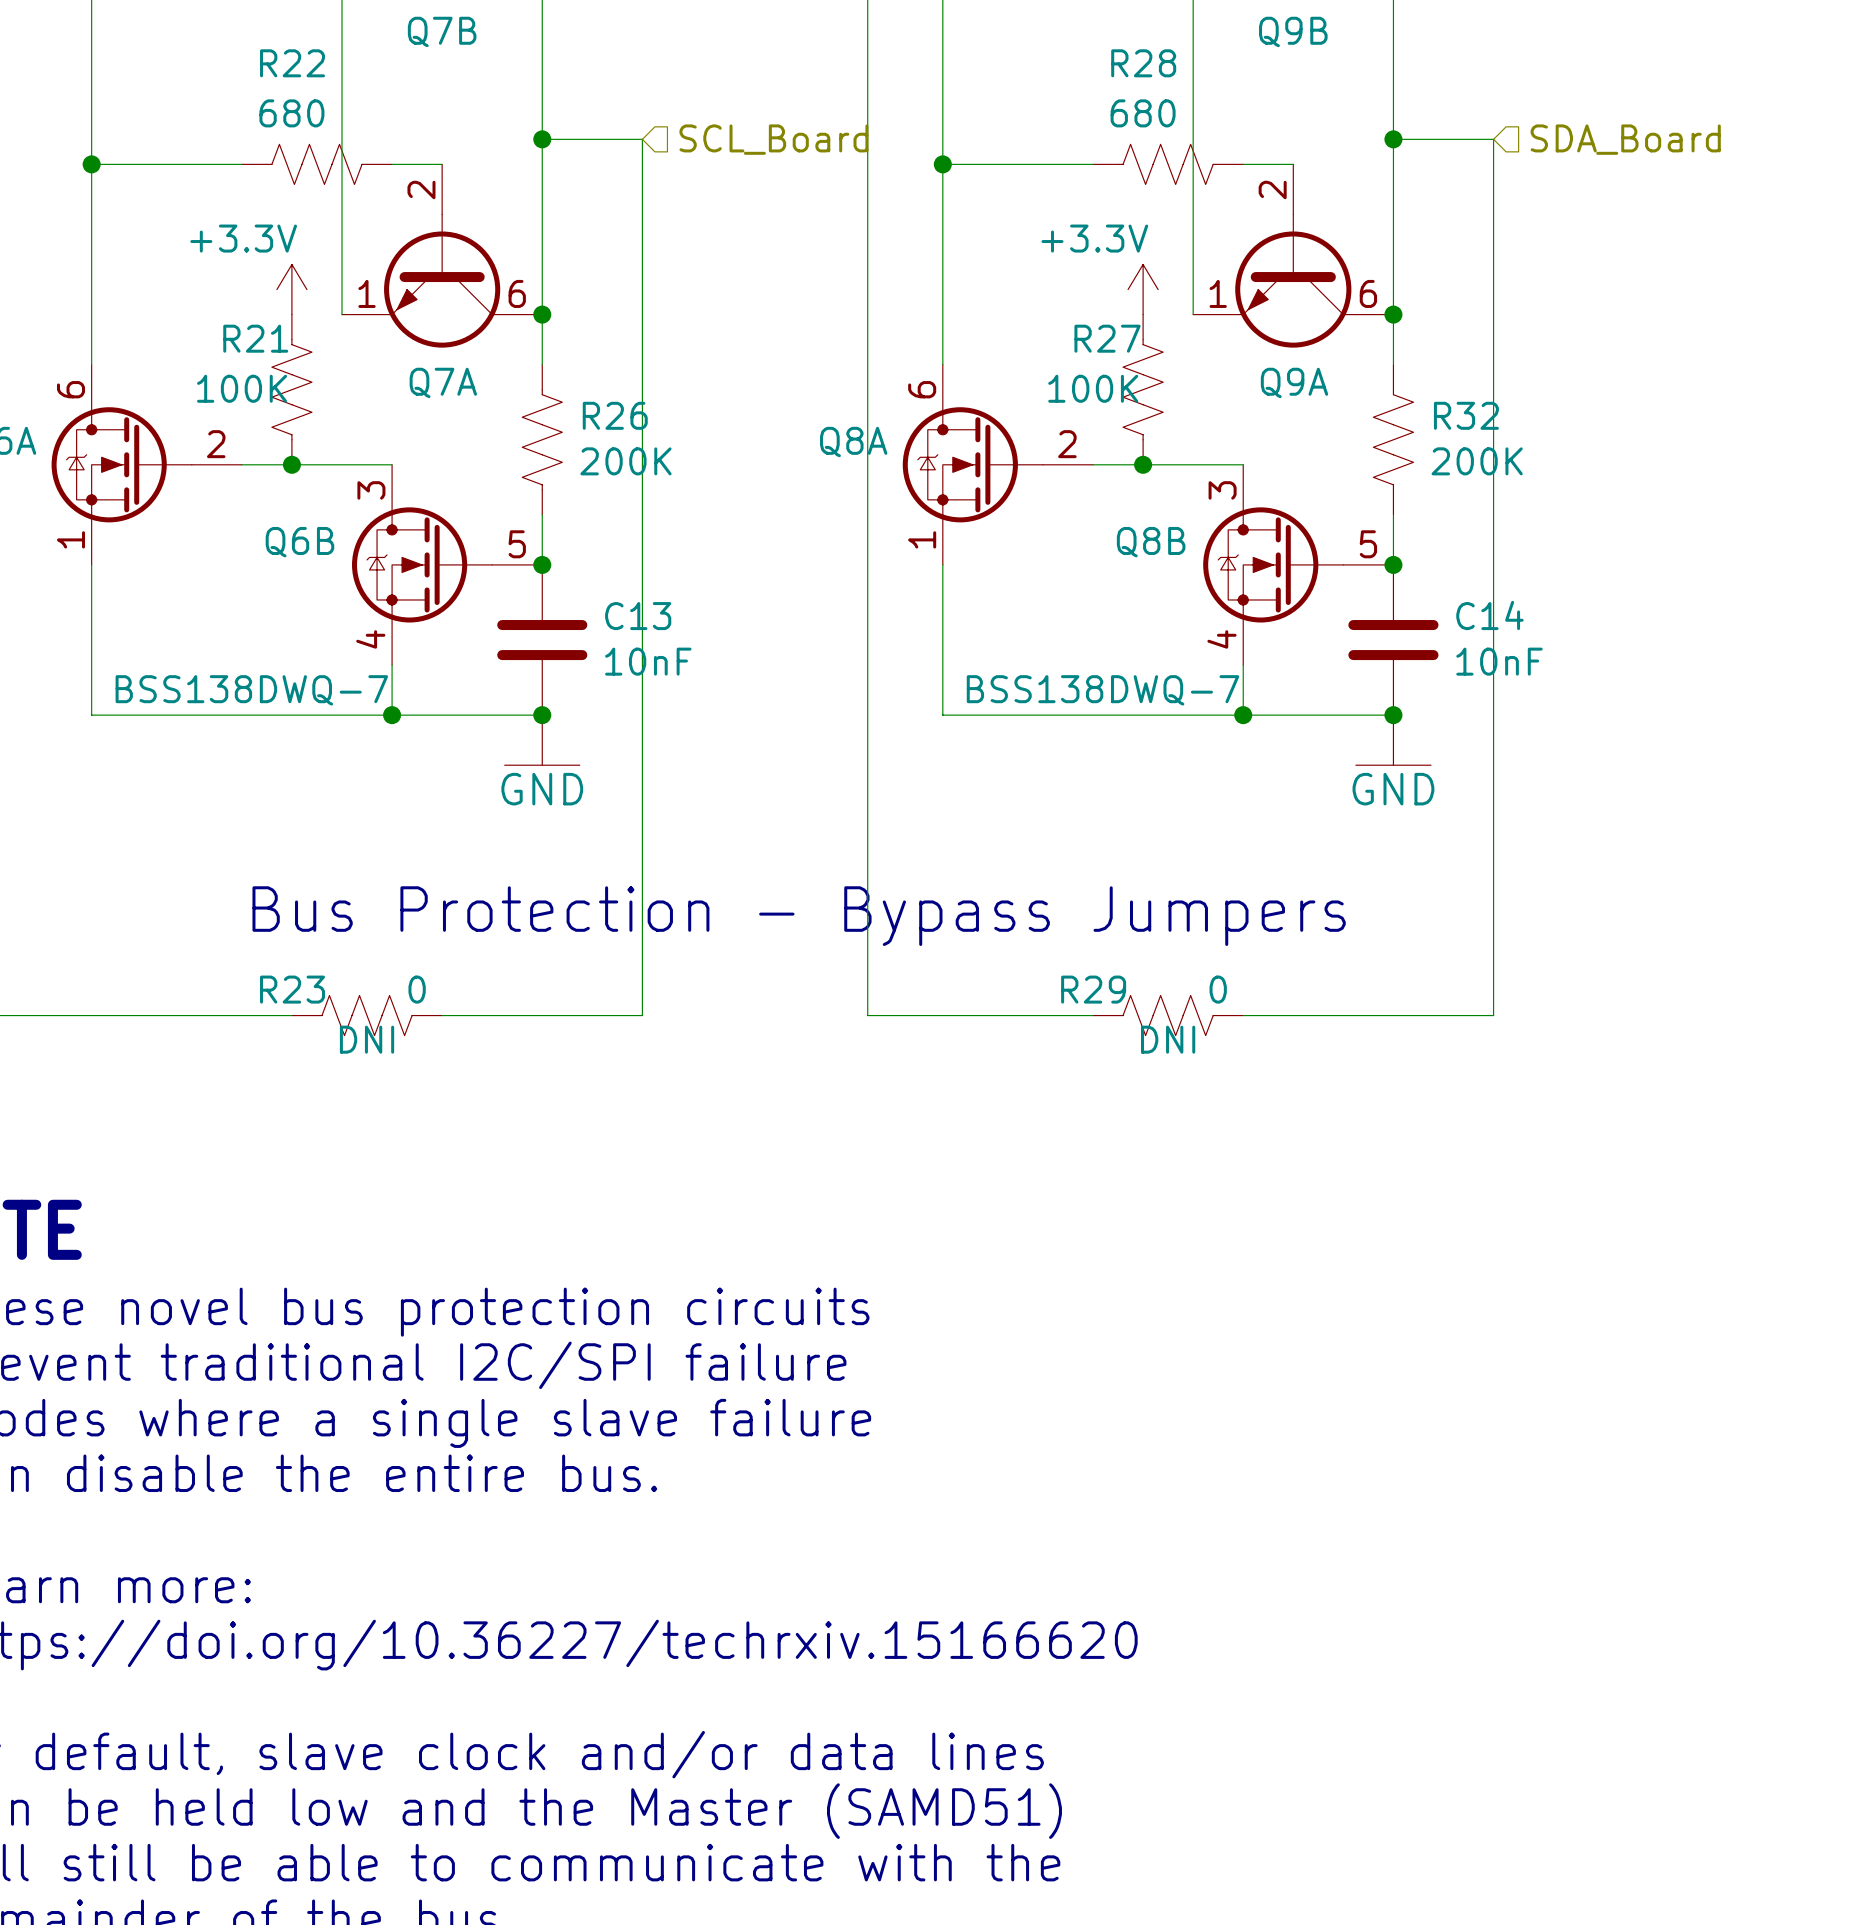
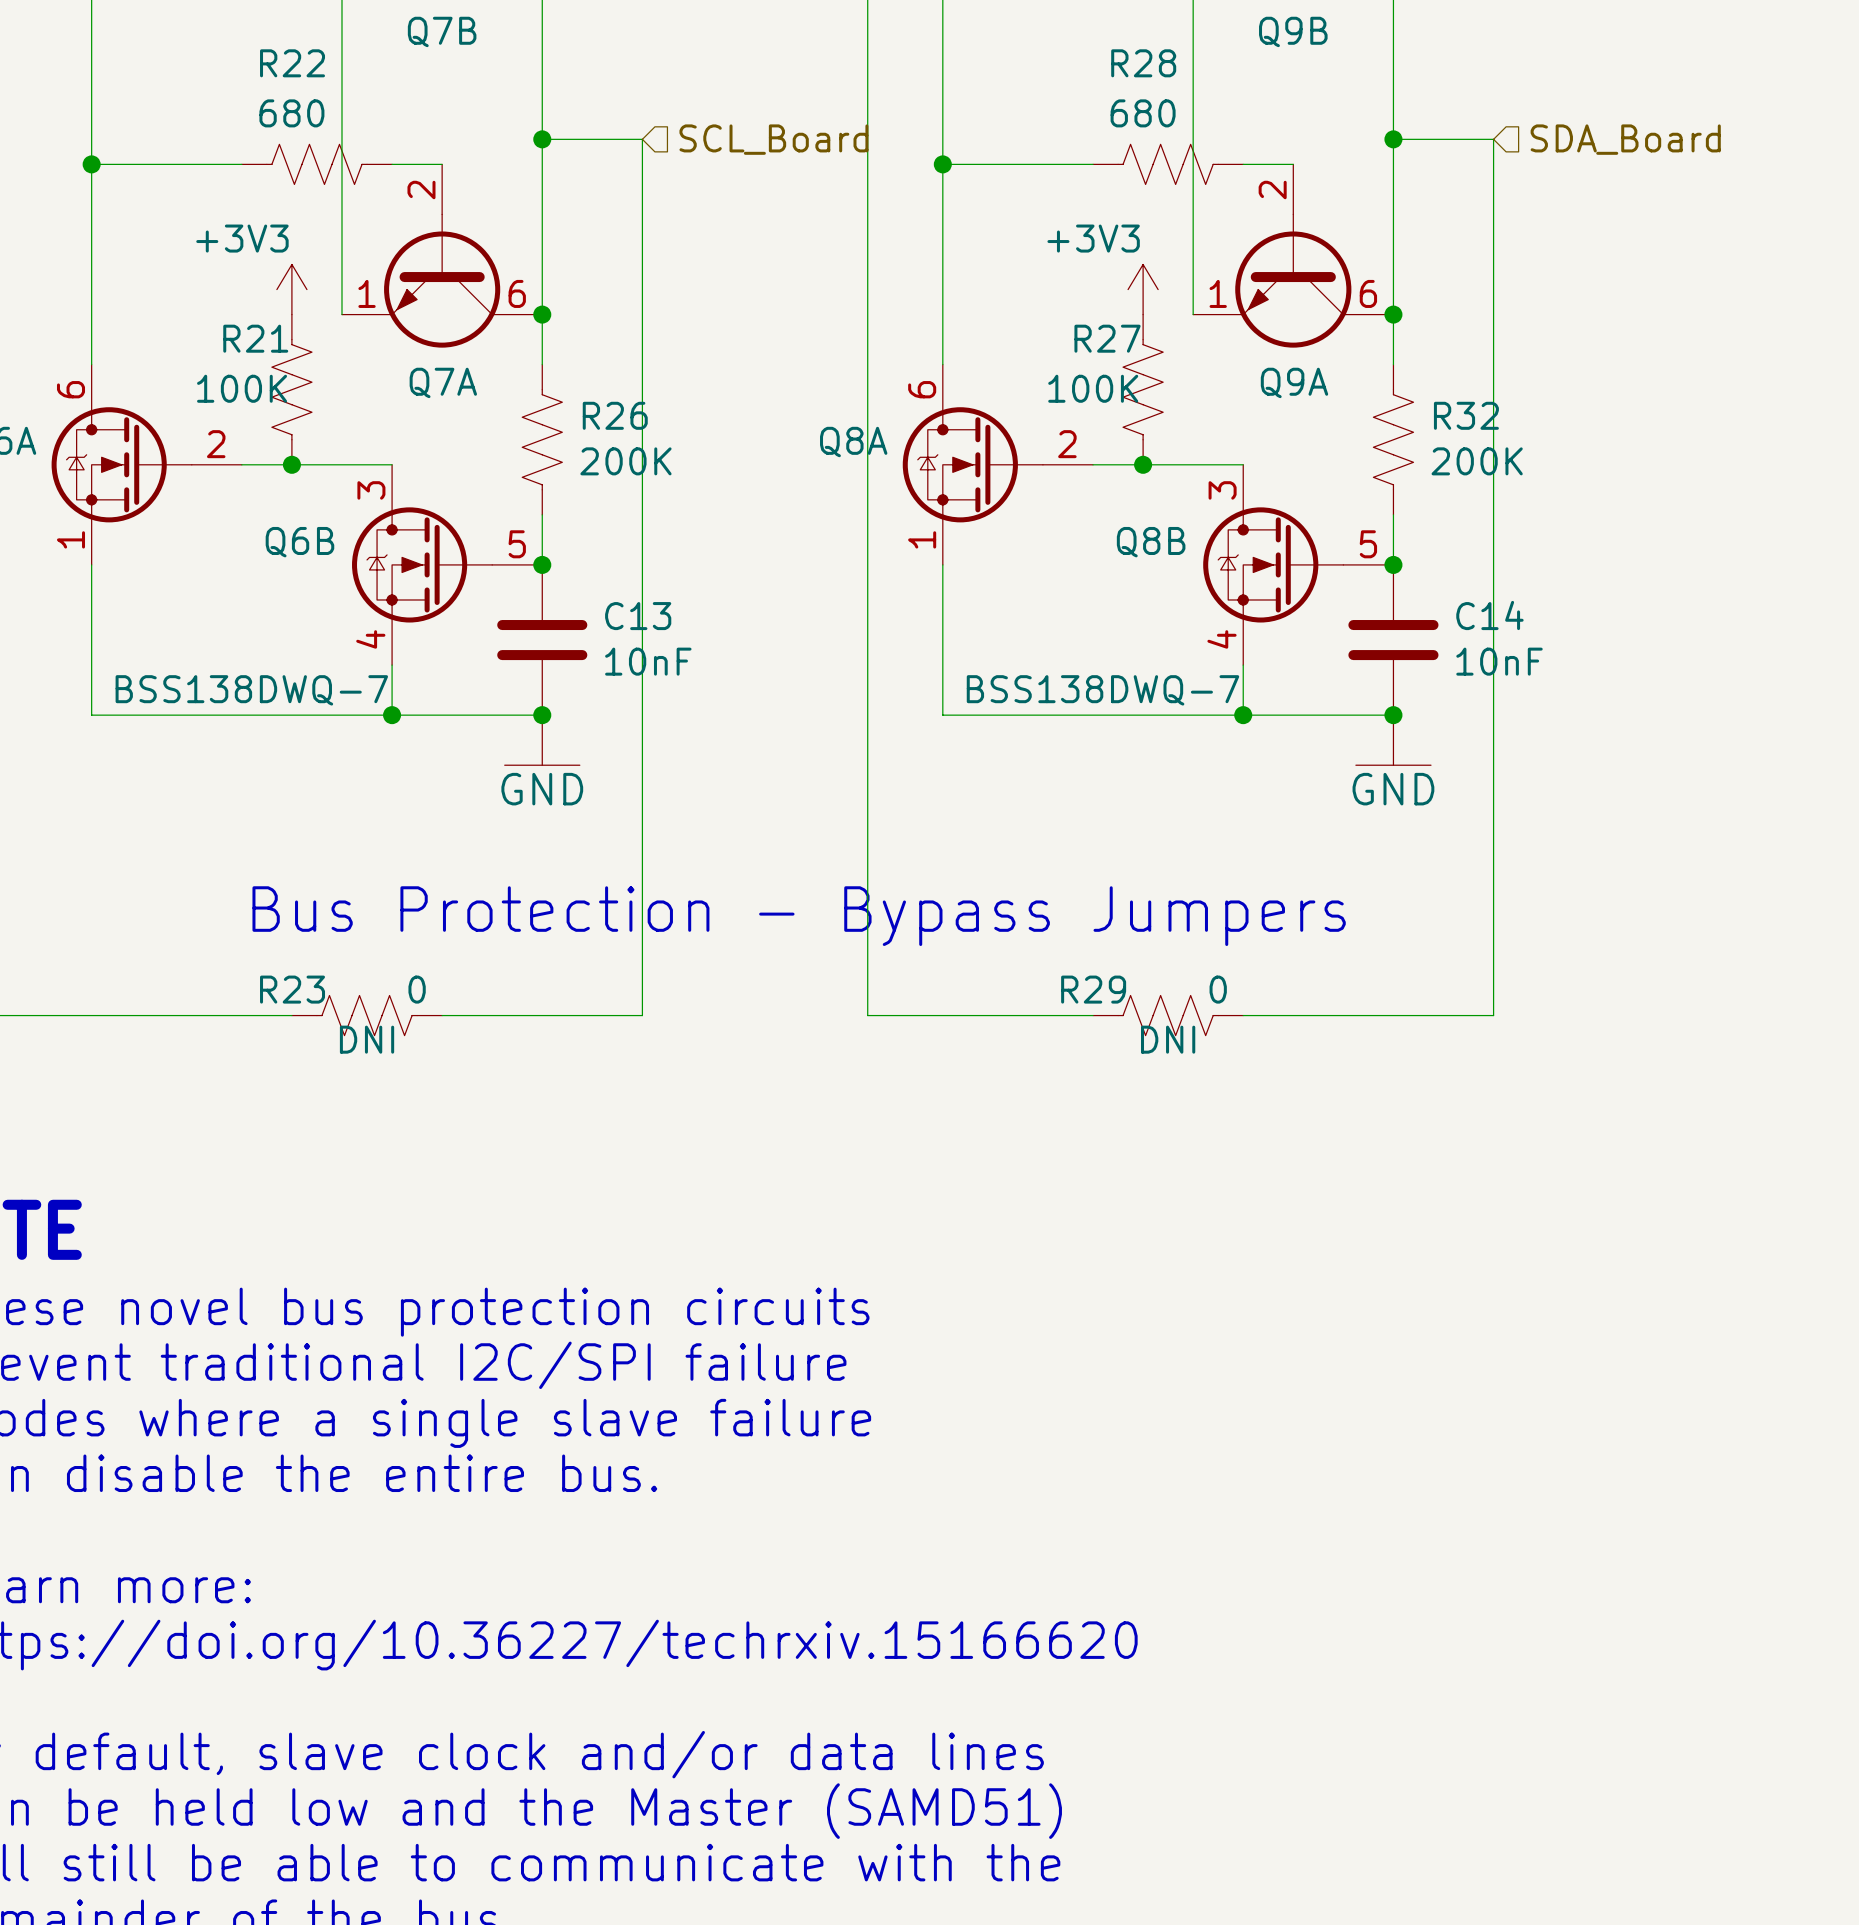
power symbol: +3.3V (291, 289) -> +3V3 (291, 289)
power symbol: +3.3V (1143, 289) -> +3V3 (1143, 289)

